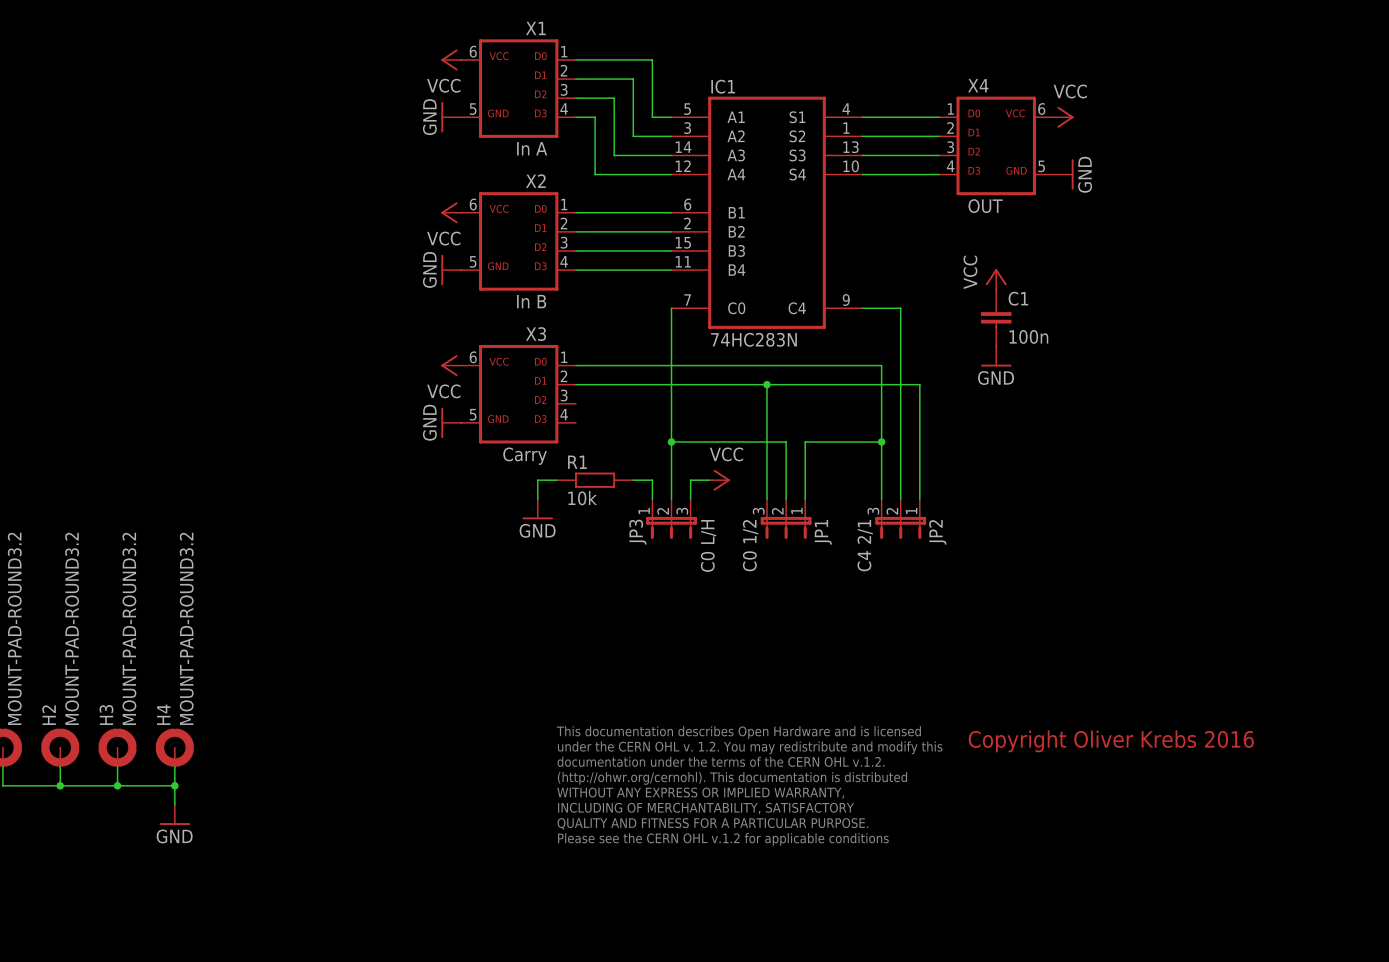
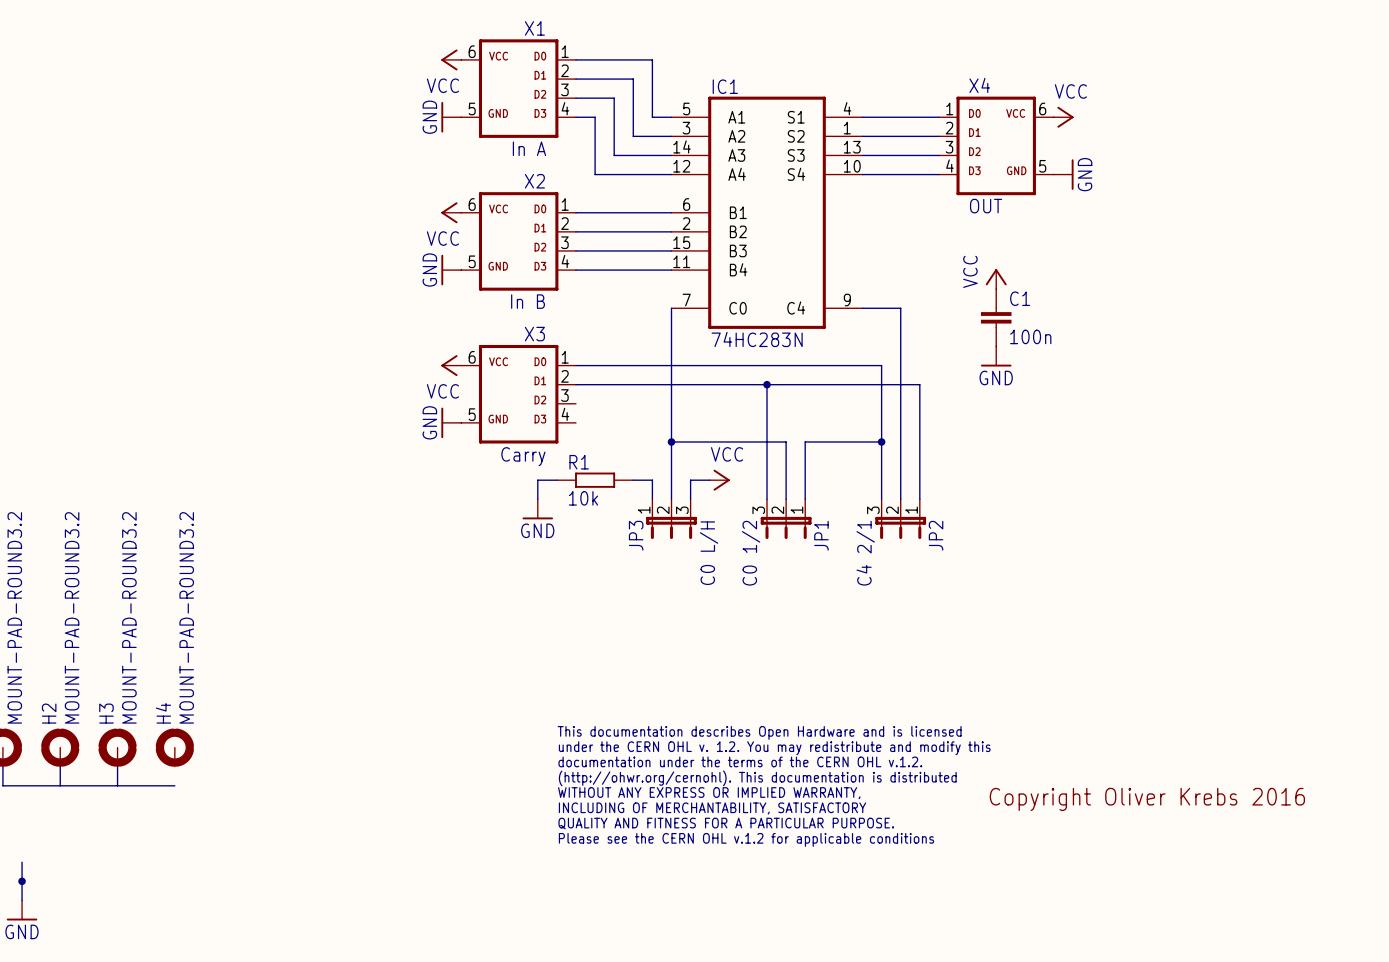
text position: Copyright Oliver Krebs 2016 (1111, 741) -> Copyright Oliver Krebs 2016 (1147, 799)
wire: (174, 766) (174, 804) -> (22, 862) (22, 900)
junction: (60, 785) -> none
junction: (117, 785) -> none
junction: (174, 785) -> none
power symbol position: GND (174, 814) -> GND (22, 910)
junction: none -> (22, 881)

